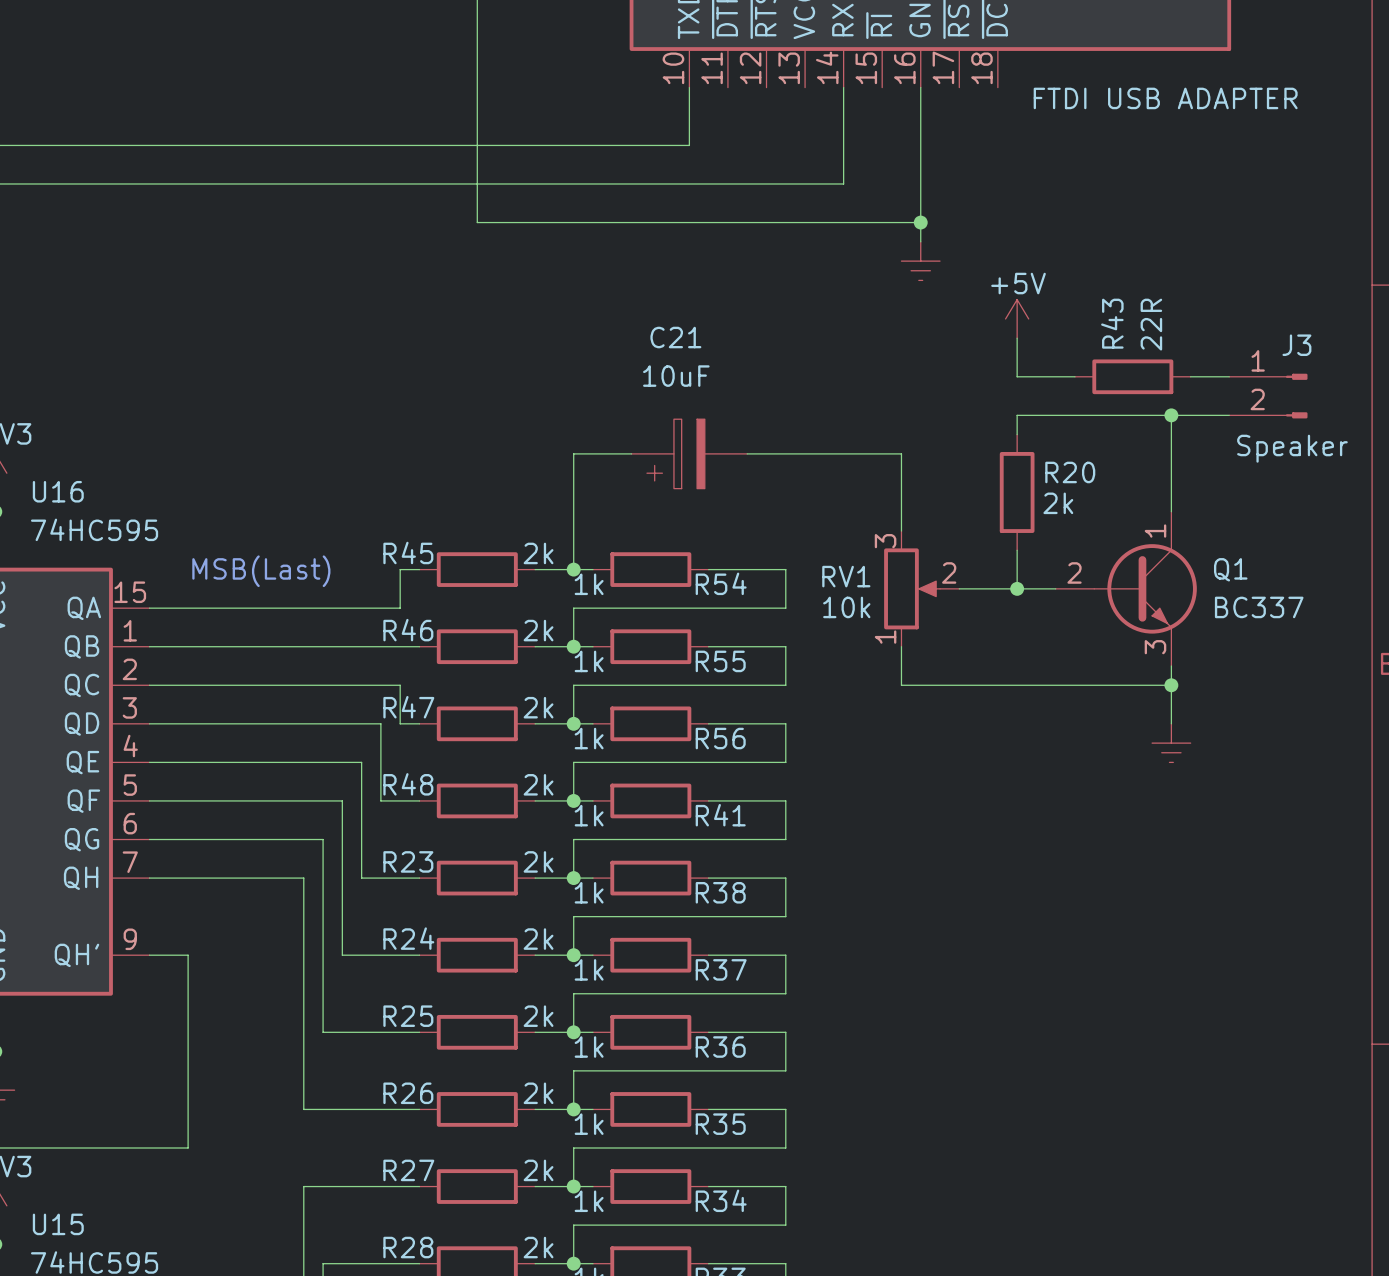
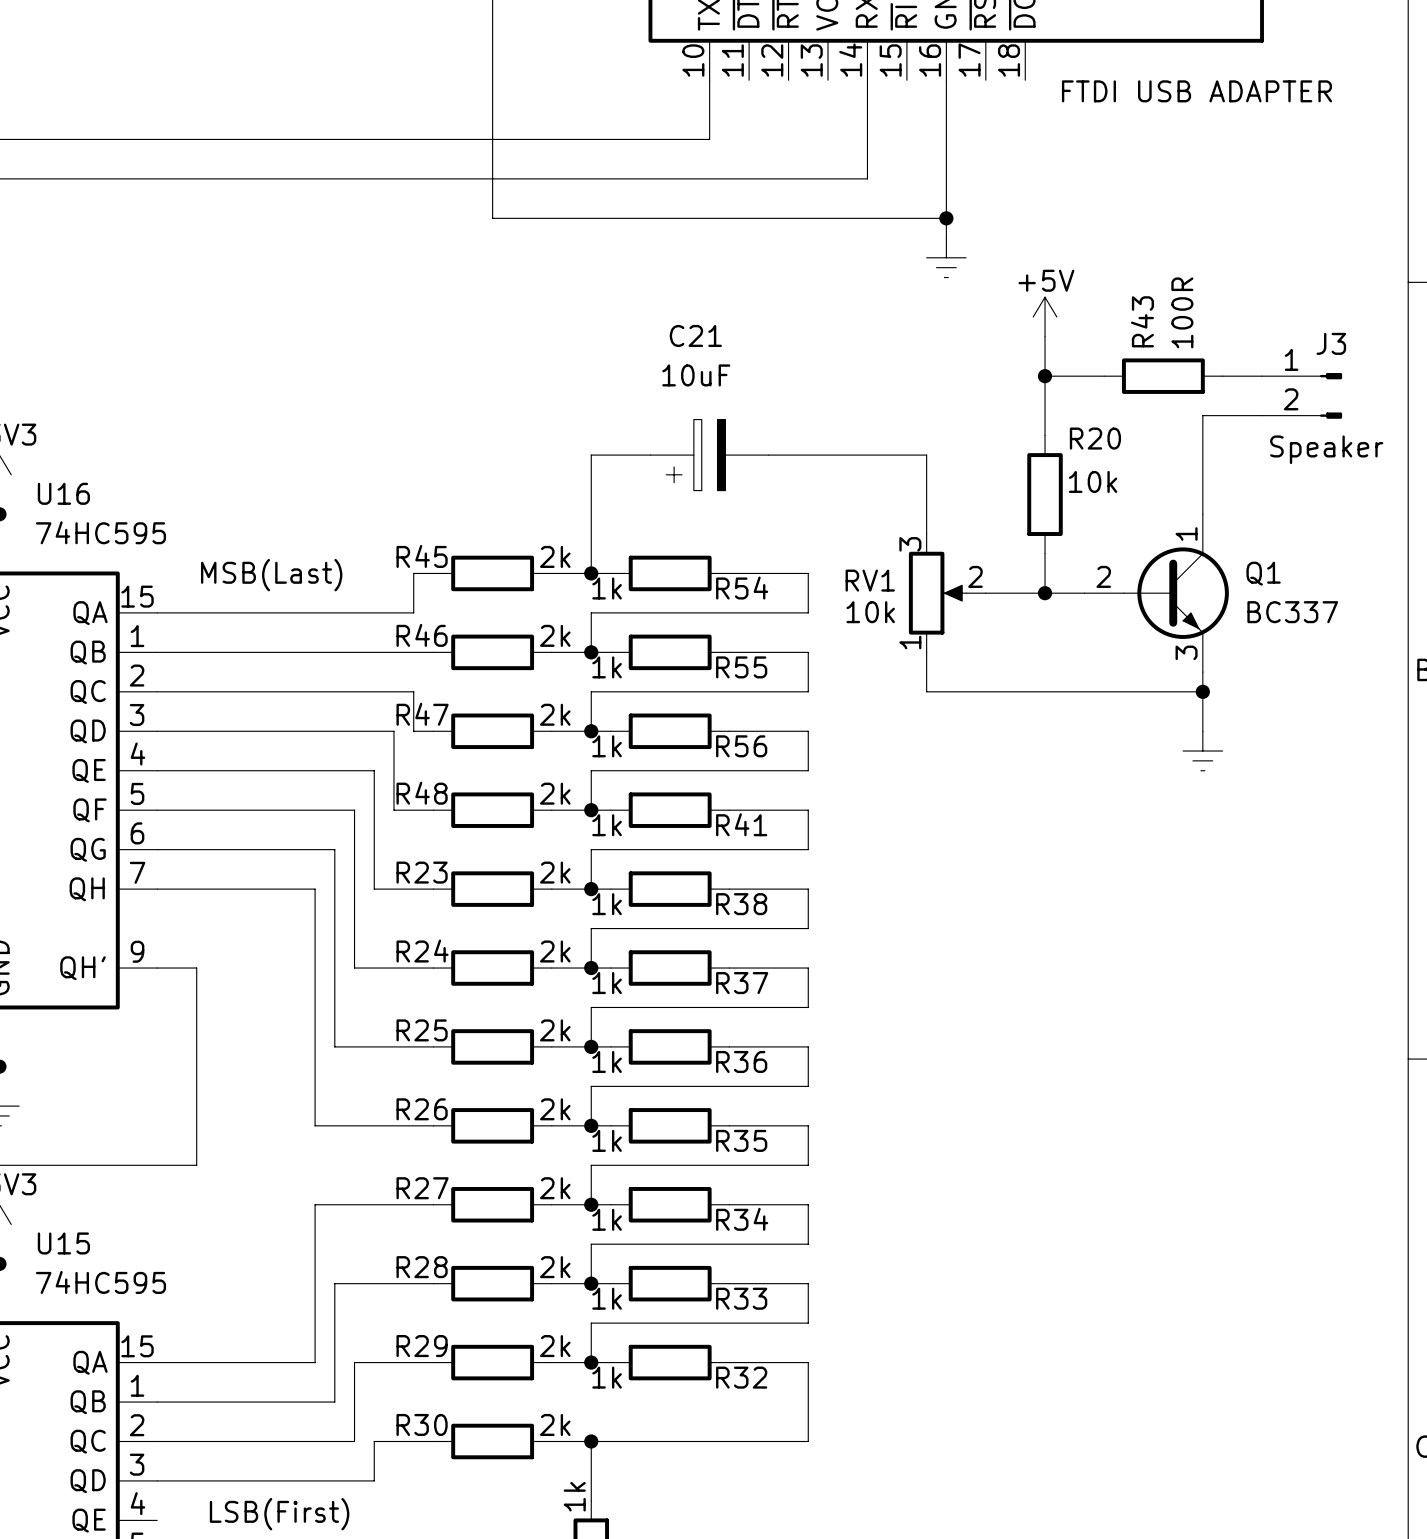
R43 value: 22R (1151, 324) -> 100R (1182, 312)
junction: none -> (1045, 376)
wire: (1017, 415) (1171, 415) -> (1045, 415) (1045, 376)
junction: (1171, 415) -> none
R20 name position: R20 (1070, 472) -> R20 (1095, 438)
R20 value: 2k (1058, 503) -> 10k (1093, 481)

